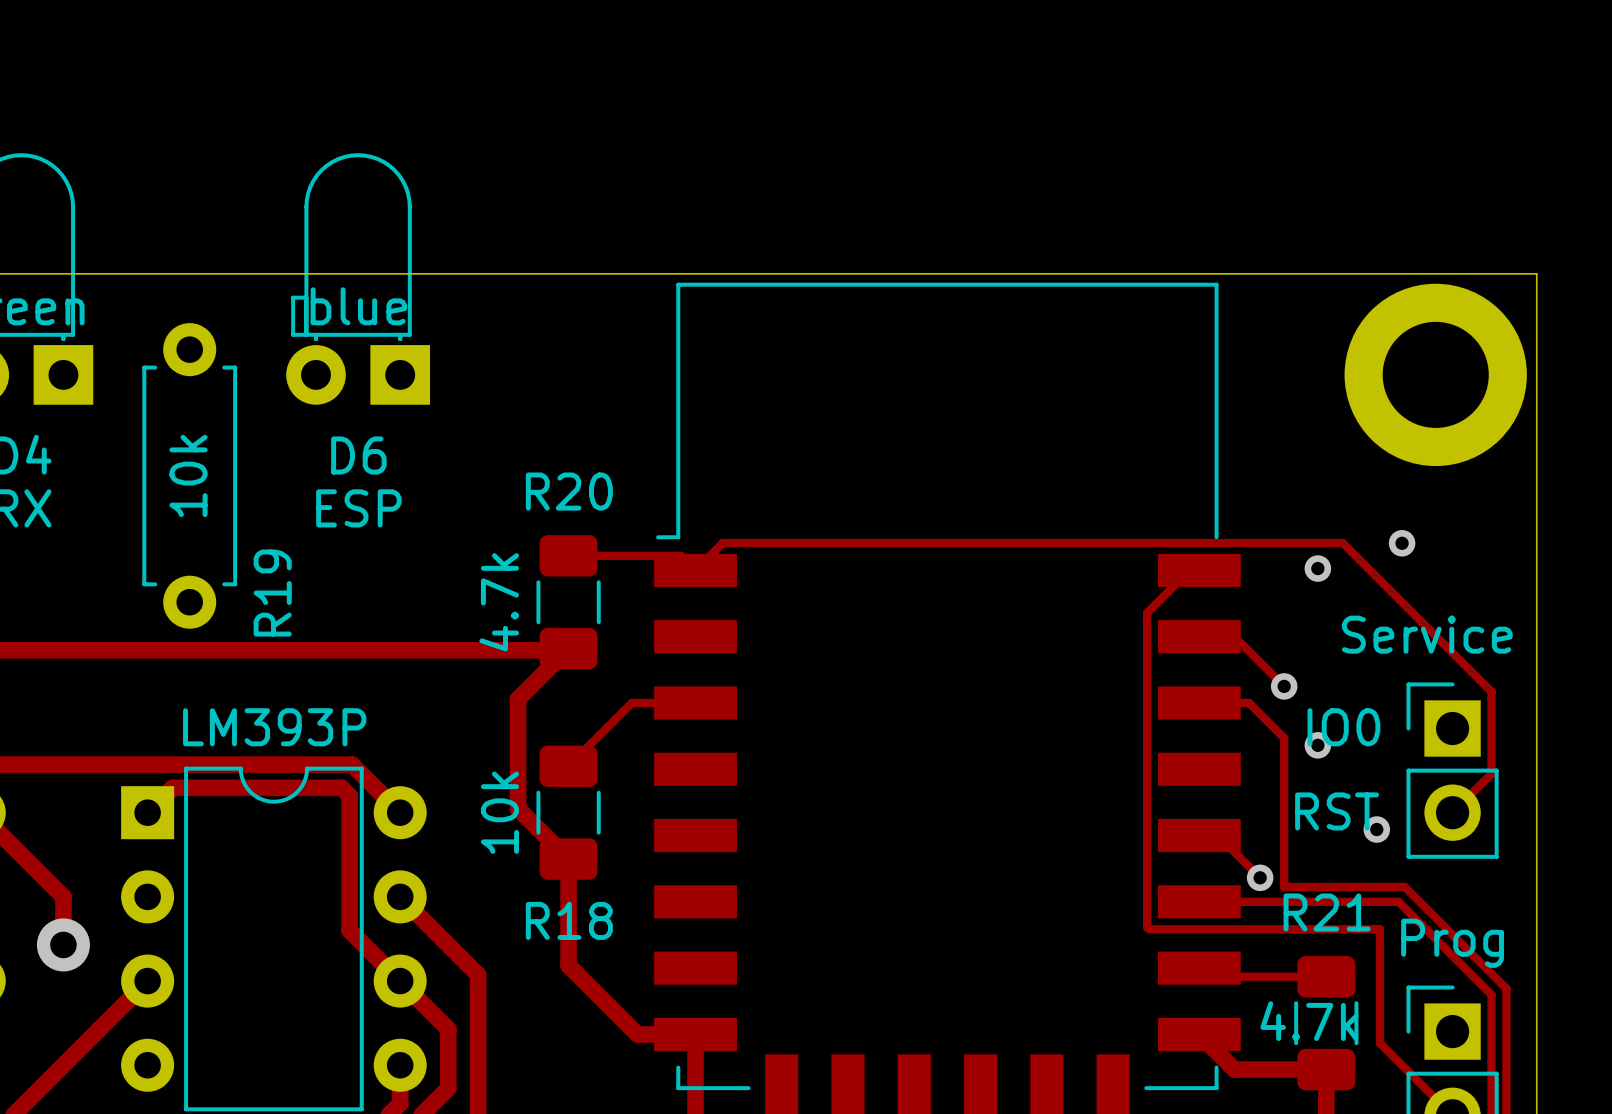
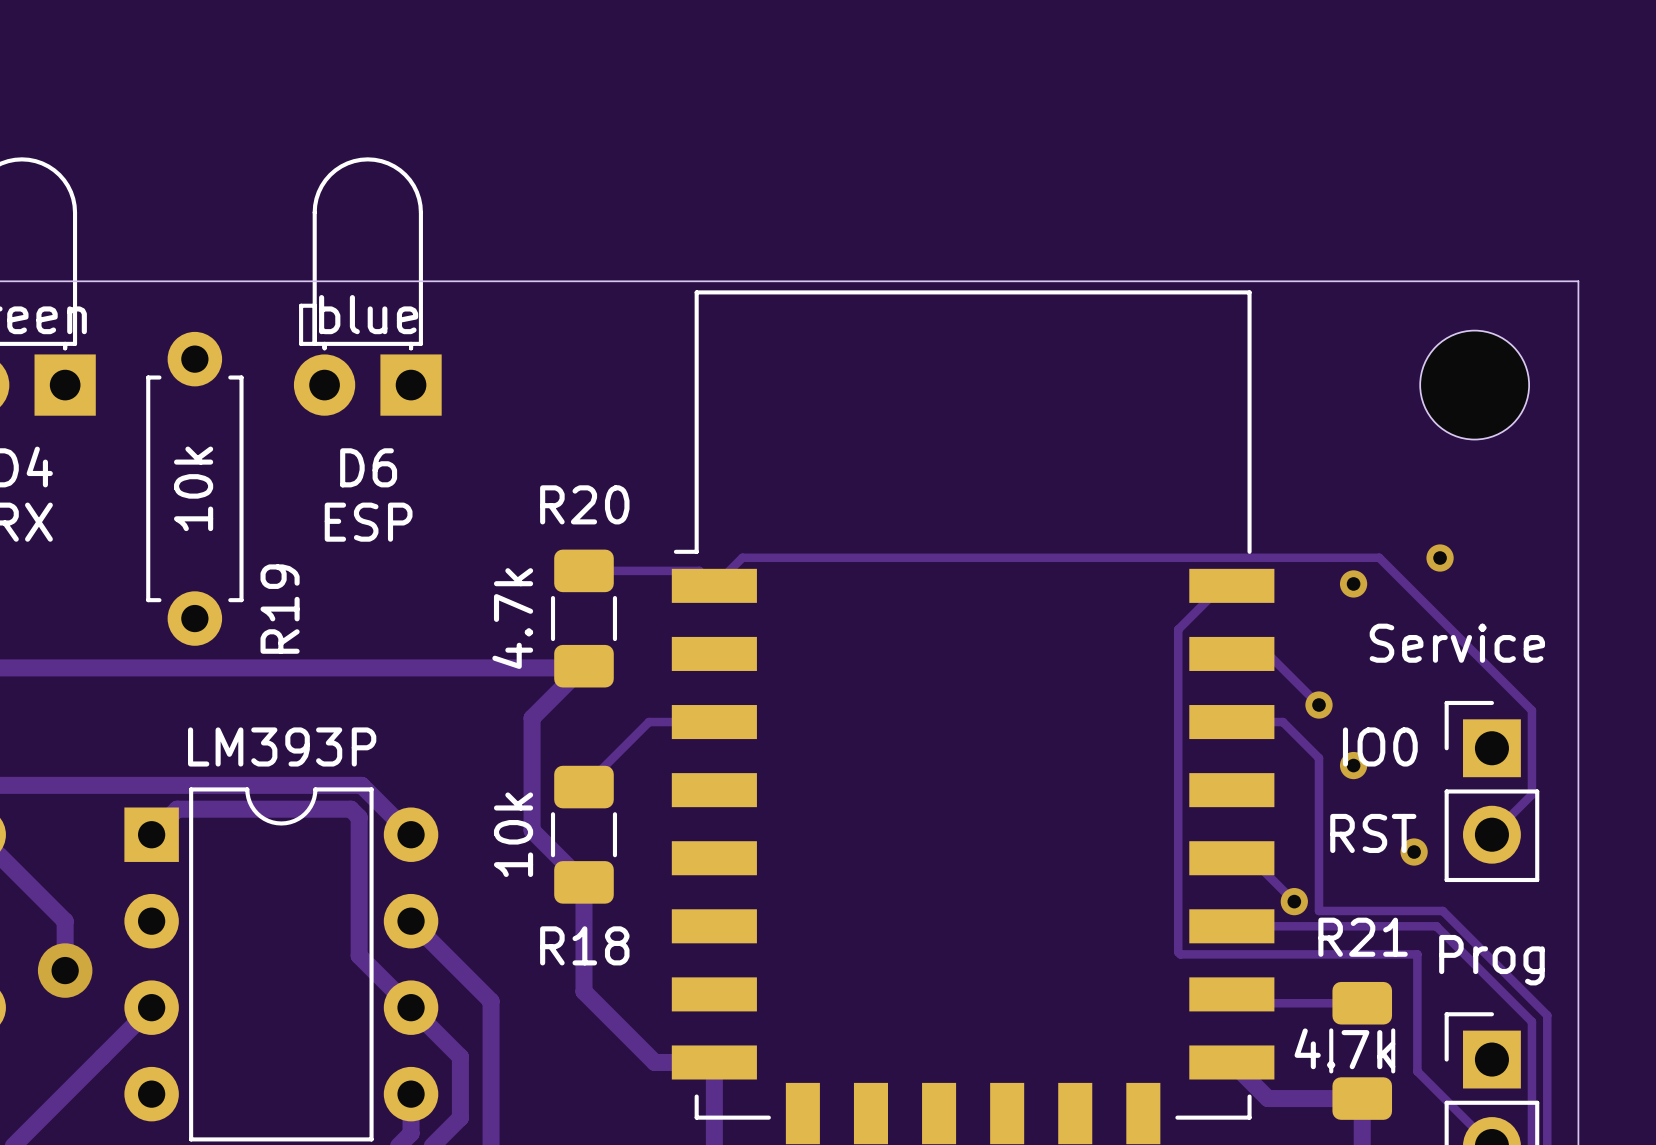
part footprint: [1344, 283, 1527, 467] -> [1420, 330, 1530, 440]
text: none -> Service (1457, 643)
Service name: Service (1427, 634) -> none
text: none -> Prog (1491, 960)
Prog name: Prog (1452, 943) -> none

